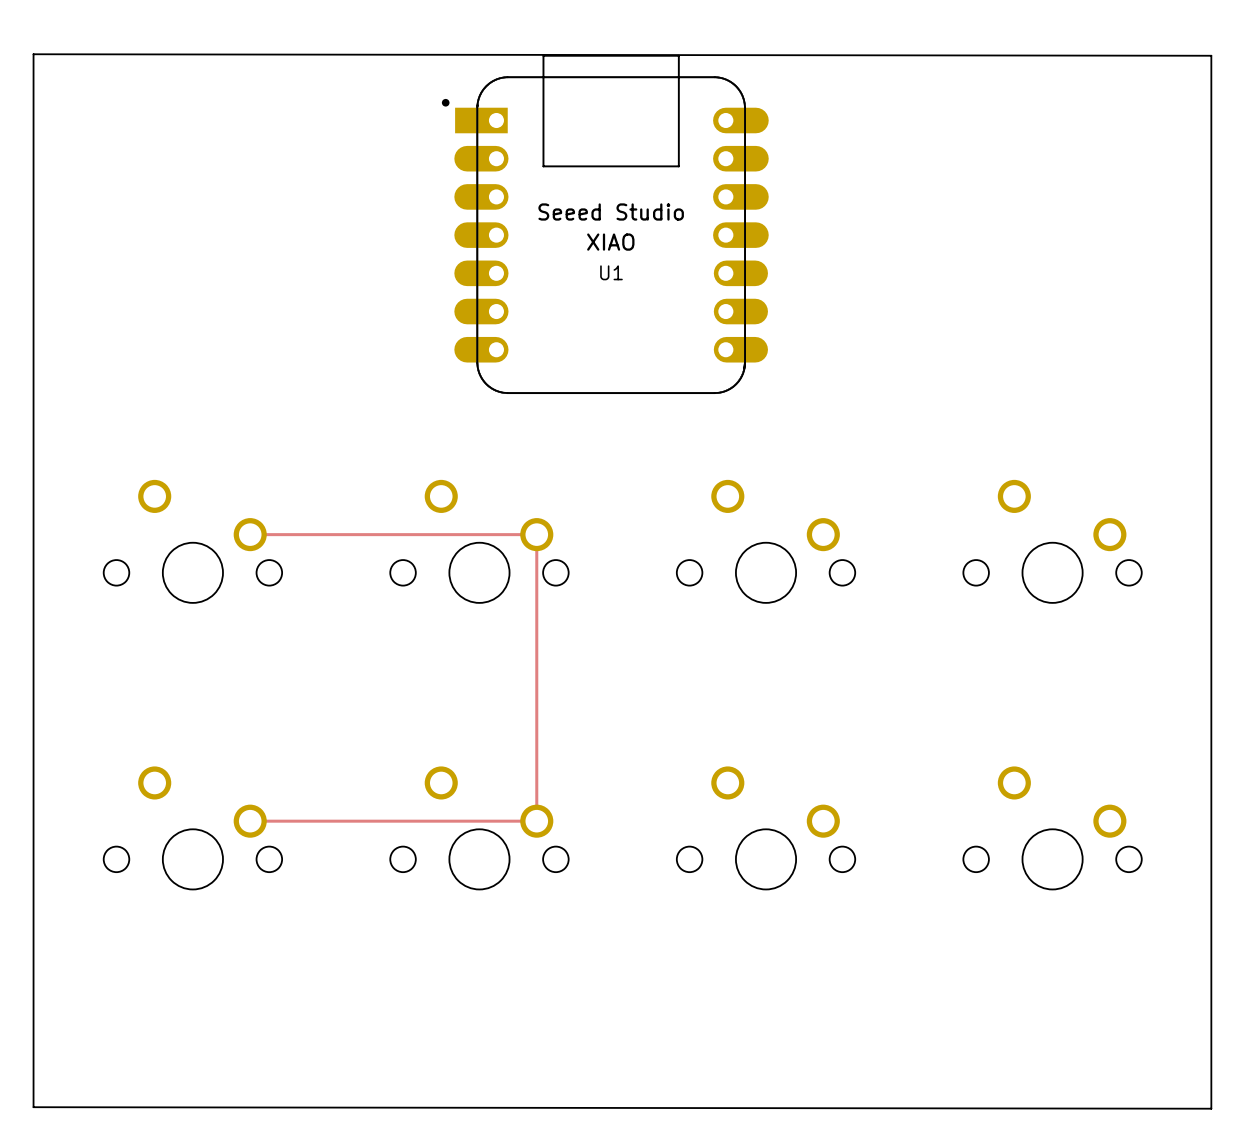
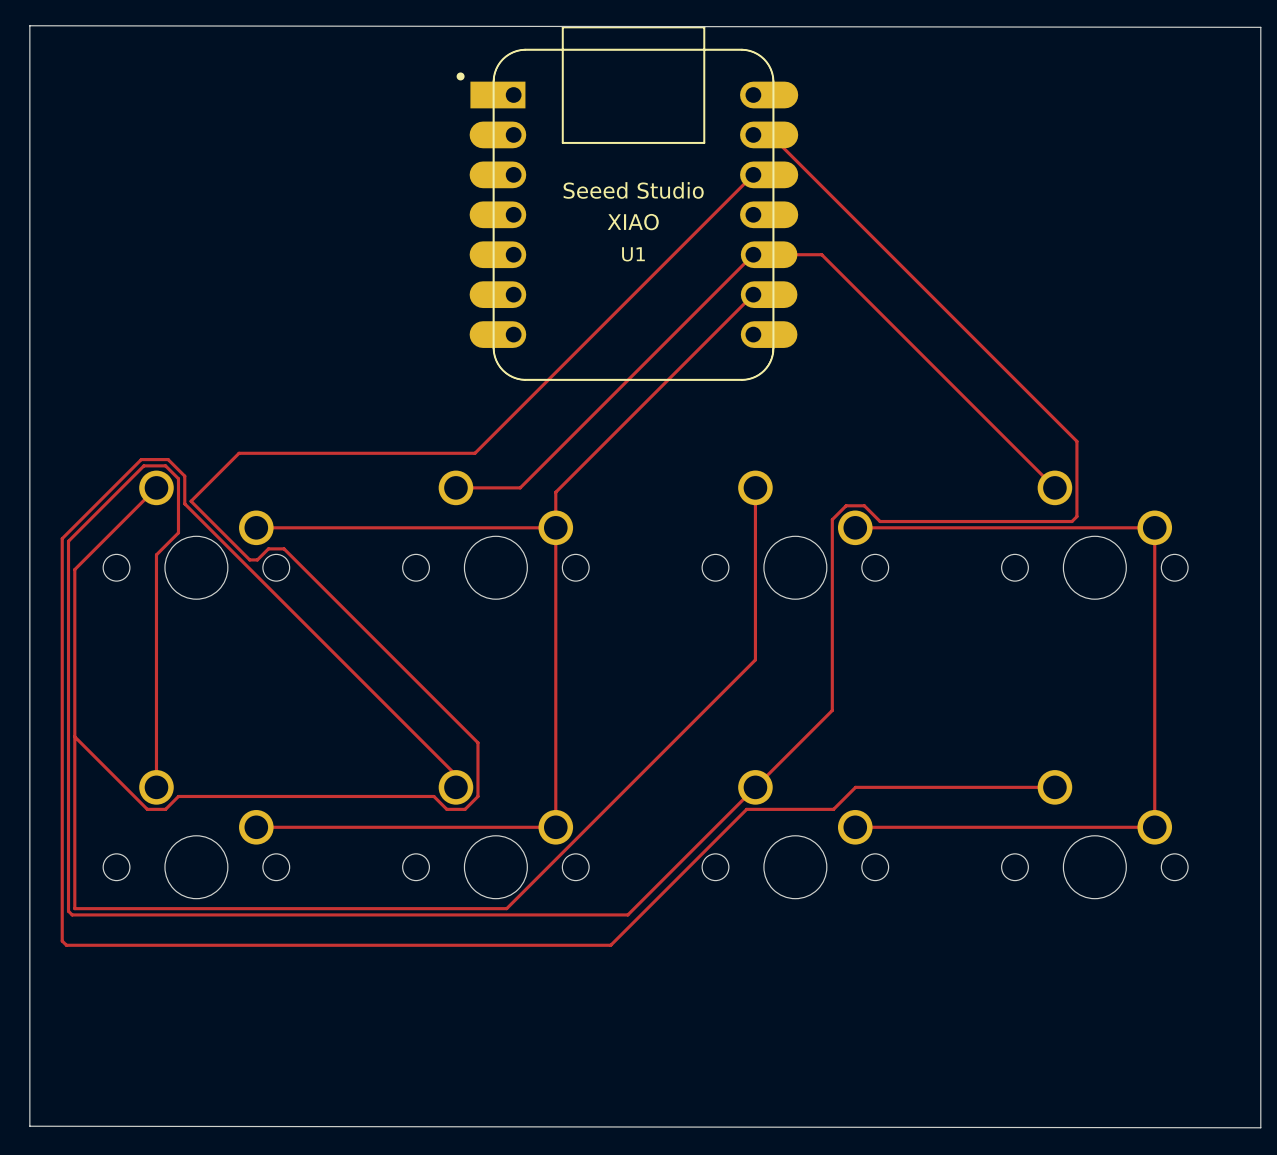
top track: none -> (753, 134) (770, 134) (1076, 441) (1076, 516) (1071, 521) (880, 521) (864, 505) (846, 505) (832, 519) (832, 710) (627, 914) (72, 914) (68, 911) (68, 541) (143, 465) (165, 465) (178, 478) (178, 532) (156, 554) (156, 787)
top track: none -> (753, 174) (474, 453) (239, 453) (191, 501) (249, 559) (257, 559) (268, 548) (284, 548) (477, 742) (477, 796) (465, 809) (446, 809) (433, 796) (178, 796) (165, 809) (147, 809) (74, 736)
top track: none -> (753, 294) (555, 492) (555, 527)
top track: none -> (755, 487) (755, 659) (506, 908) (74, 908) (74, 569) (156, 487)
top track: none -> (1054, 487) (821, 254) (753, 254) (520, 487) (455, 487)
top track: none -> (855, 527) (1154, 527) (1154, 827) (855, 827)
top track: none -> (1054, 787) (855, 787) (833, 809) (746, 809) (610, 945) (66, 945) (62, 941) (62, 538) (141, 459) (168, 459) (184, 476) (184, 503) (455, 775) (455, 787)

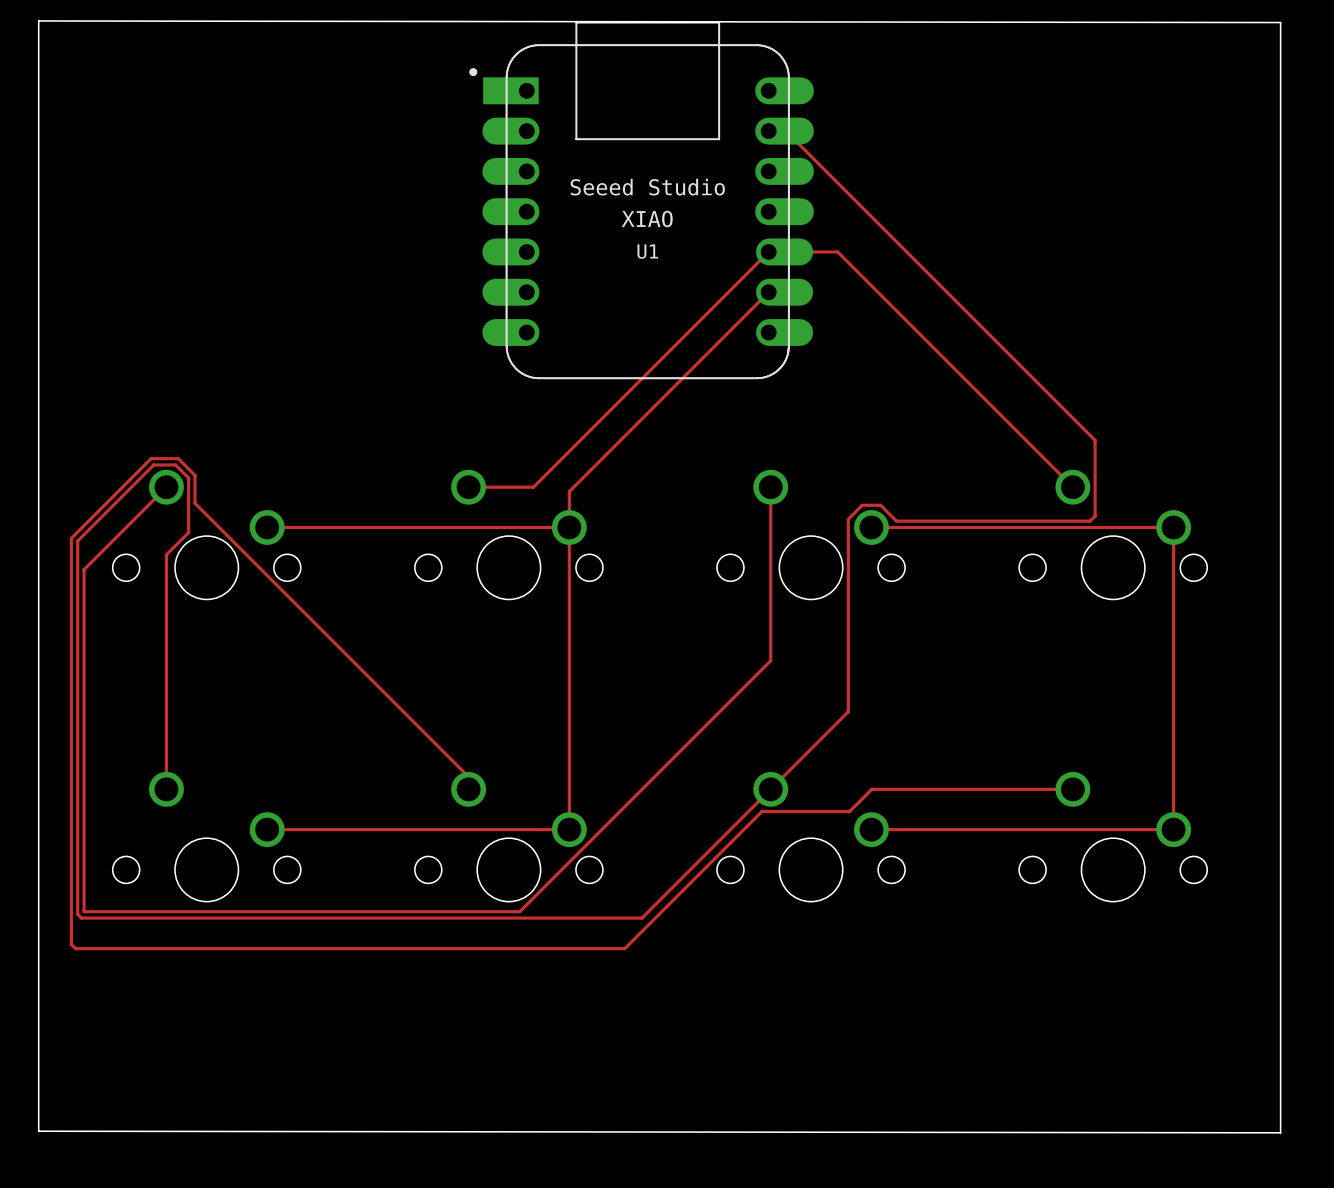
top track: (753, 174) (474, 453) (239, 453) (191, 501) (249, 559) (257, 559) (268, 548) (284, 548) (477, 742) (477, 796) (465, 809) (446, 809) (433, 796) (178, 796) (165, 809) (147, 809) (74, 736) -> none

